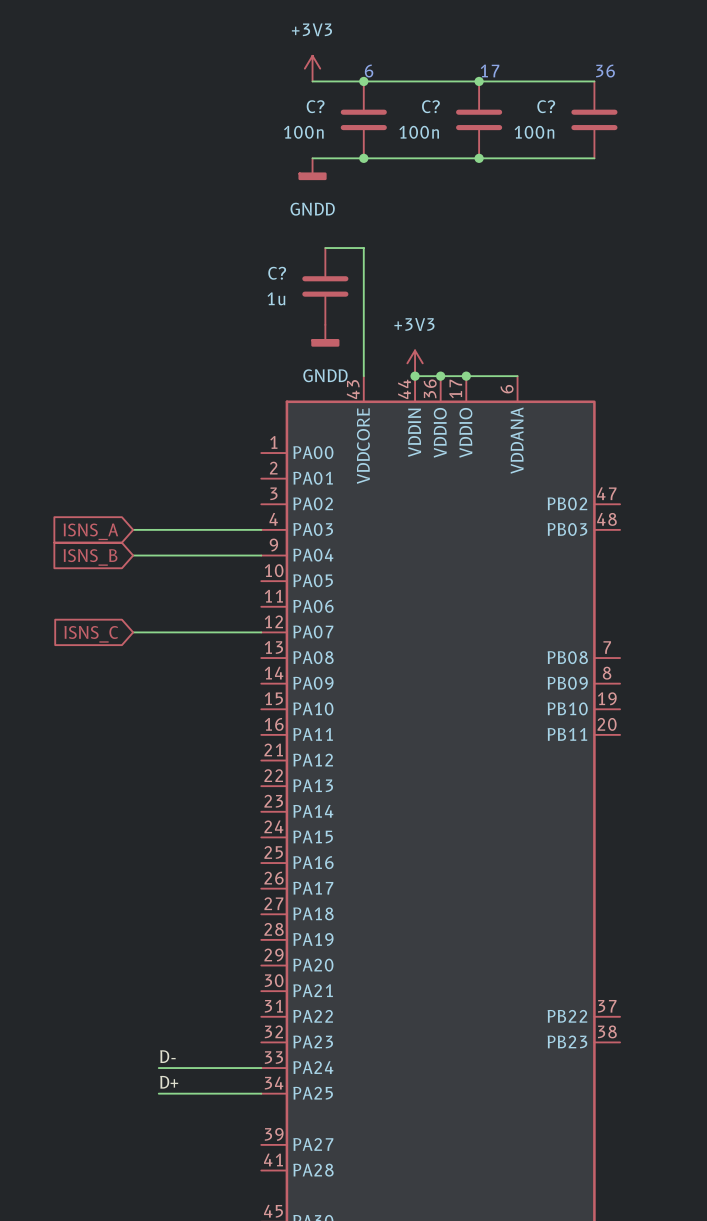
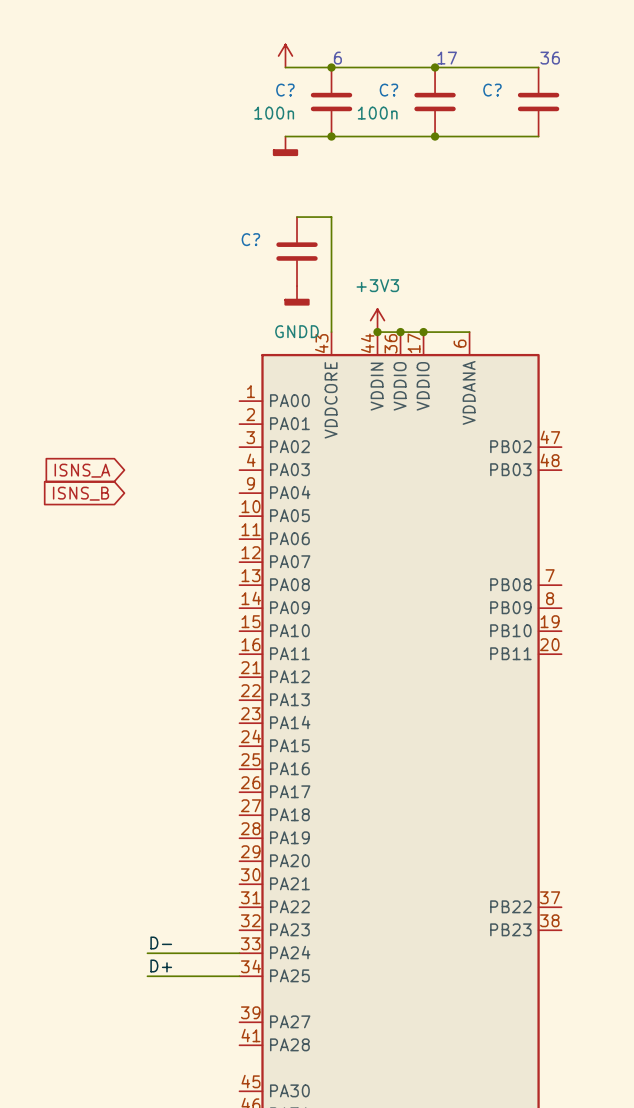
power symbol text: +3V3 (311, 29) -> none
C? value: 100n (534, 132) -> none
power symbol text: GNDD (312, 209) -> none
C? value: 1u (276, 298) -> none
wire: (133, 529) (261, 529) -> none
wire: (133, 555) (261, 555) -> none
wire: (133, 632) (261, 632) -> none
global label: ISNS_C (91, 634) -> none

